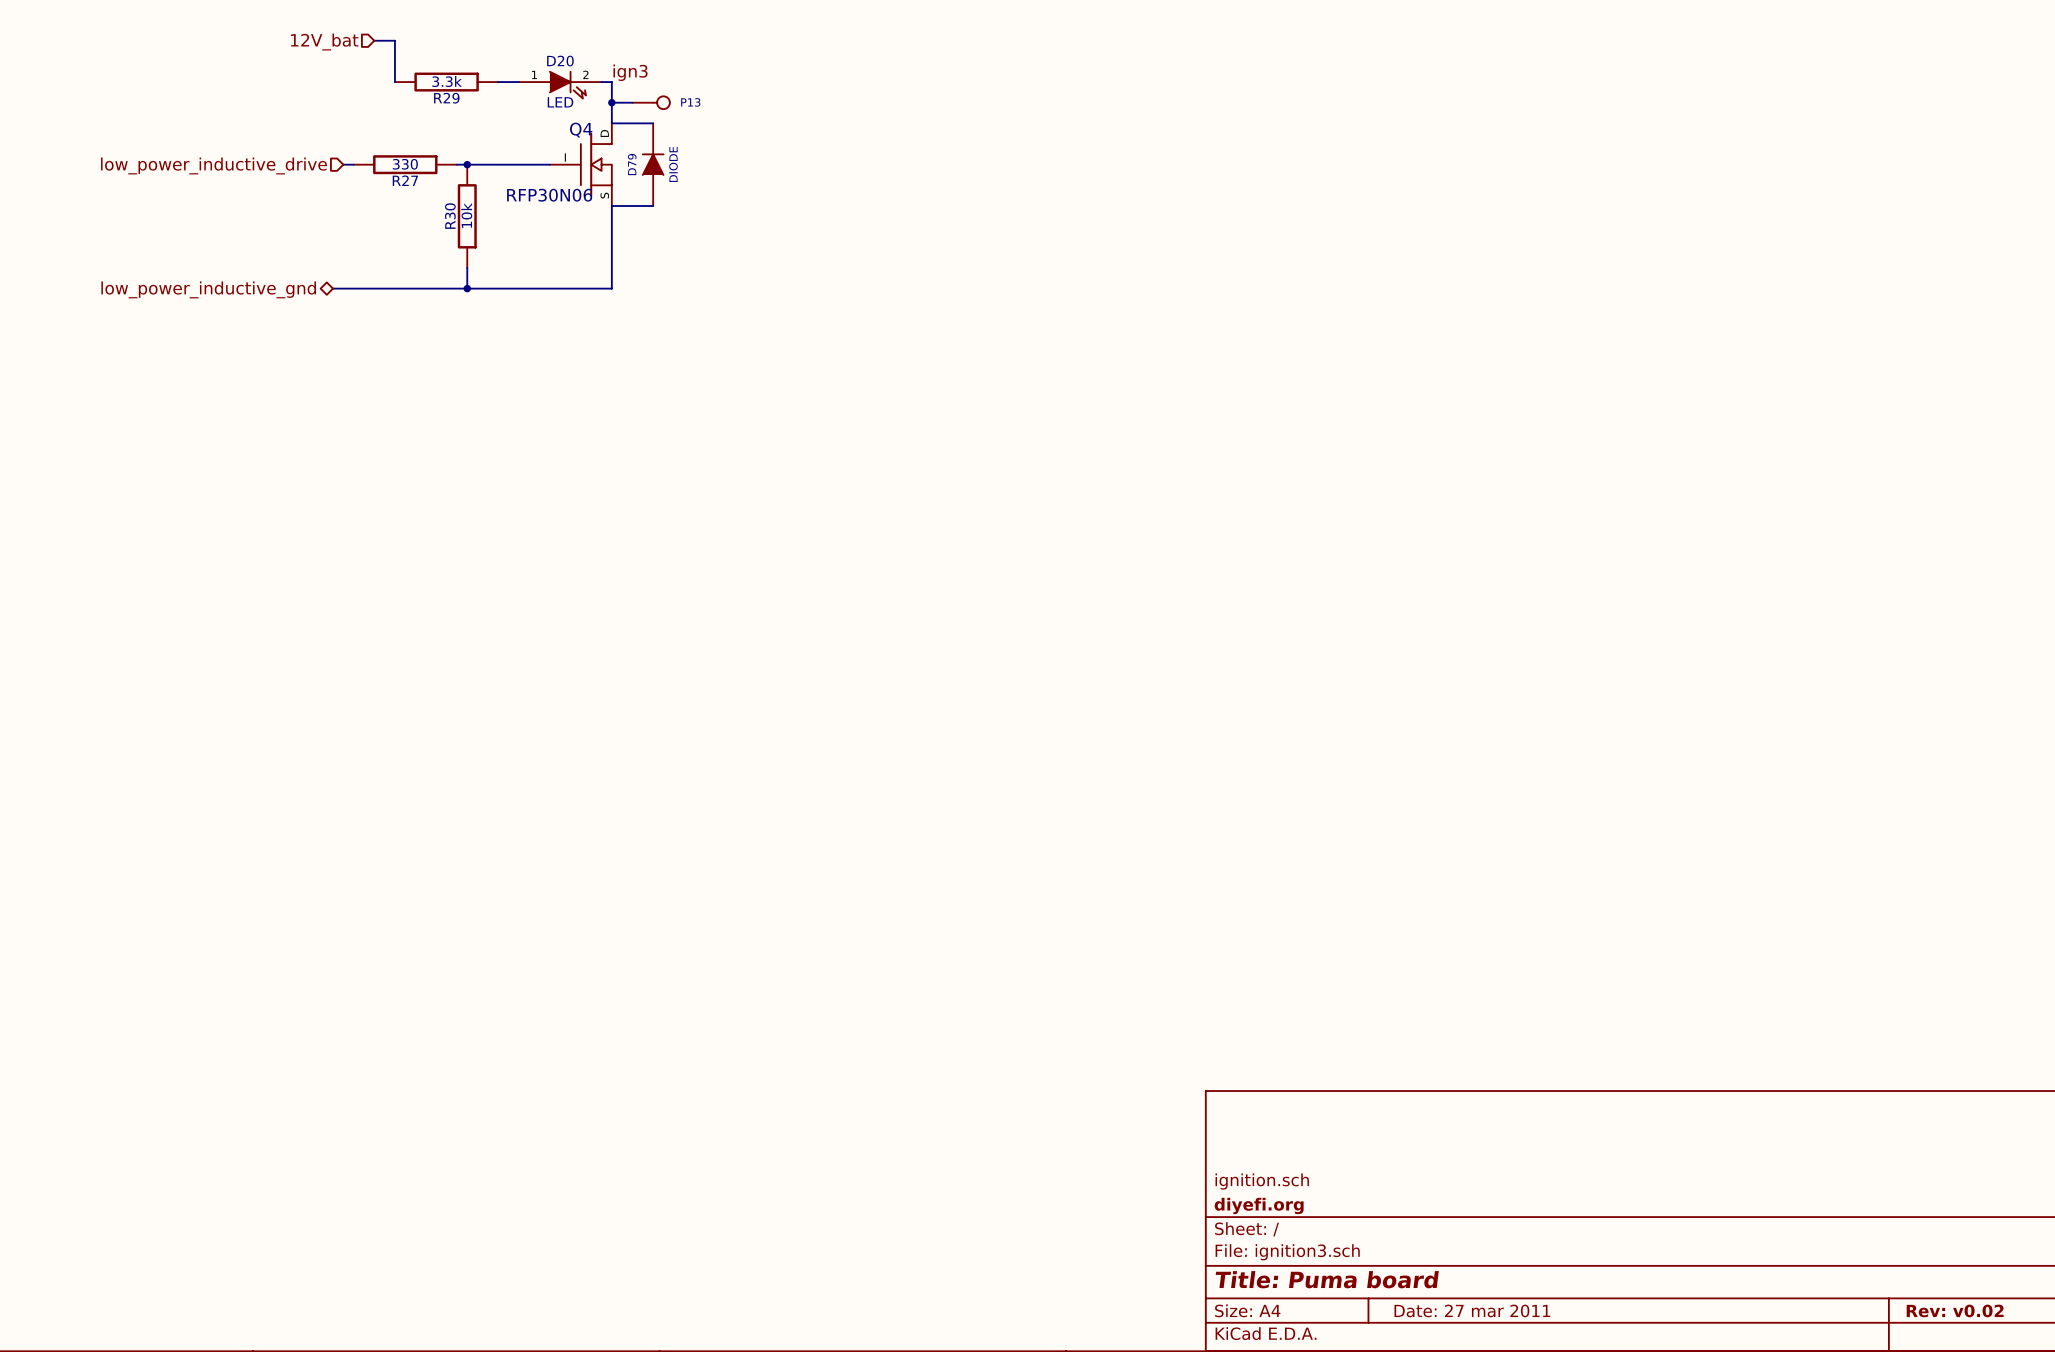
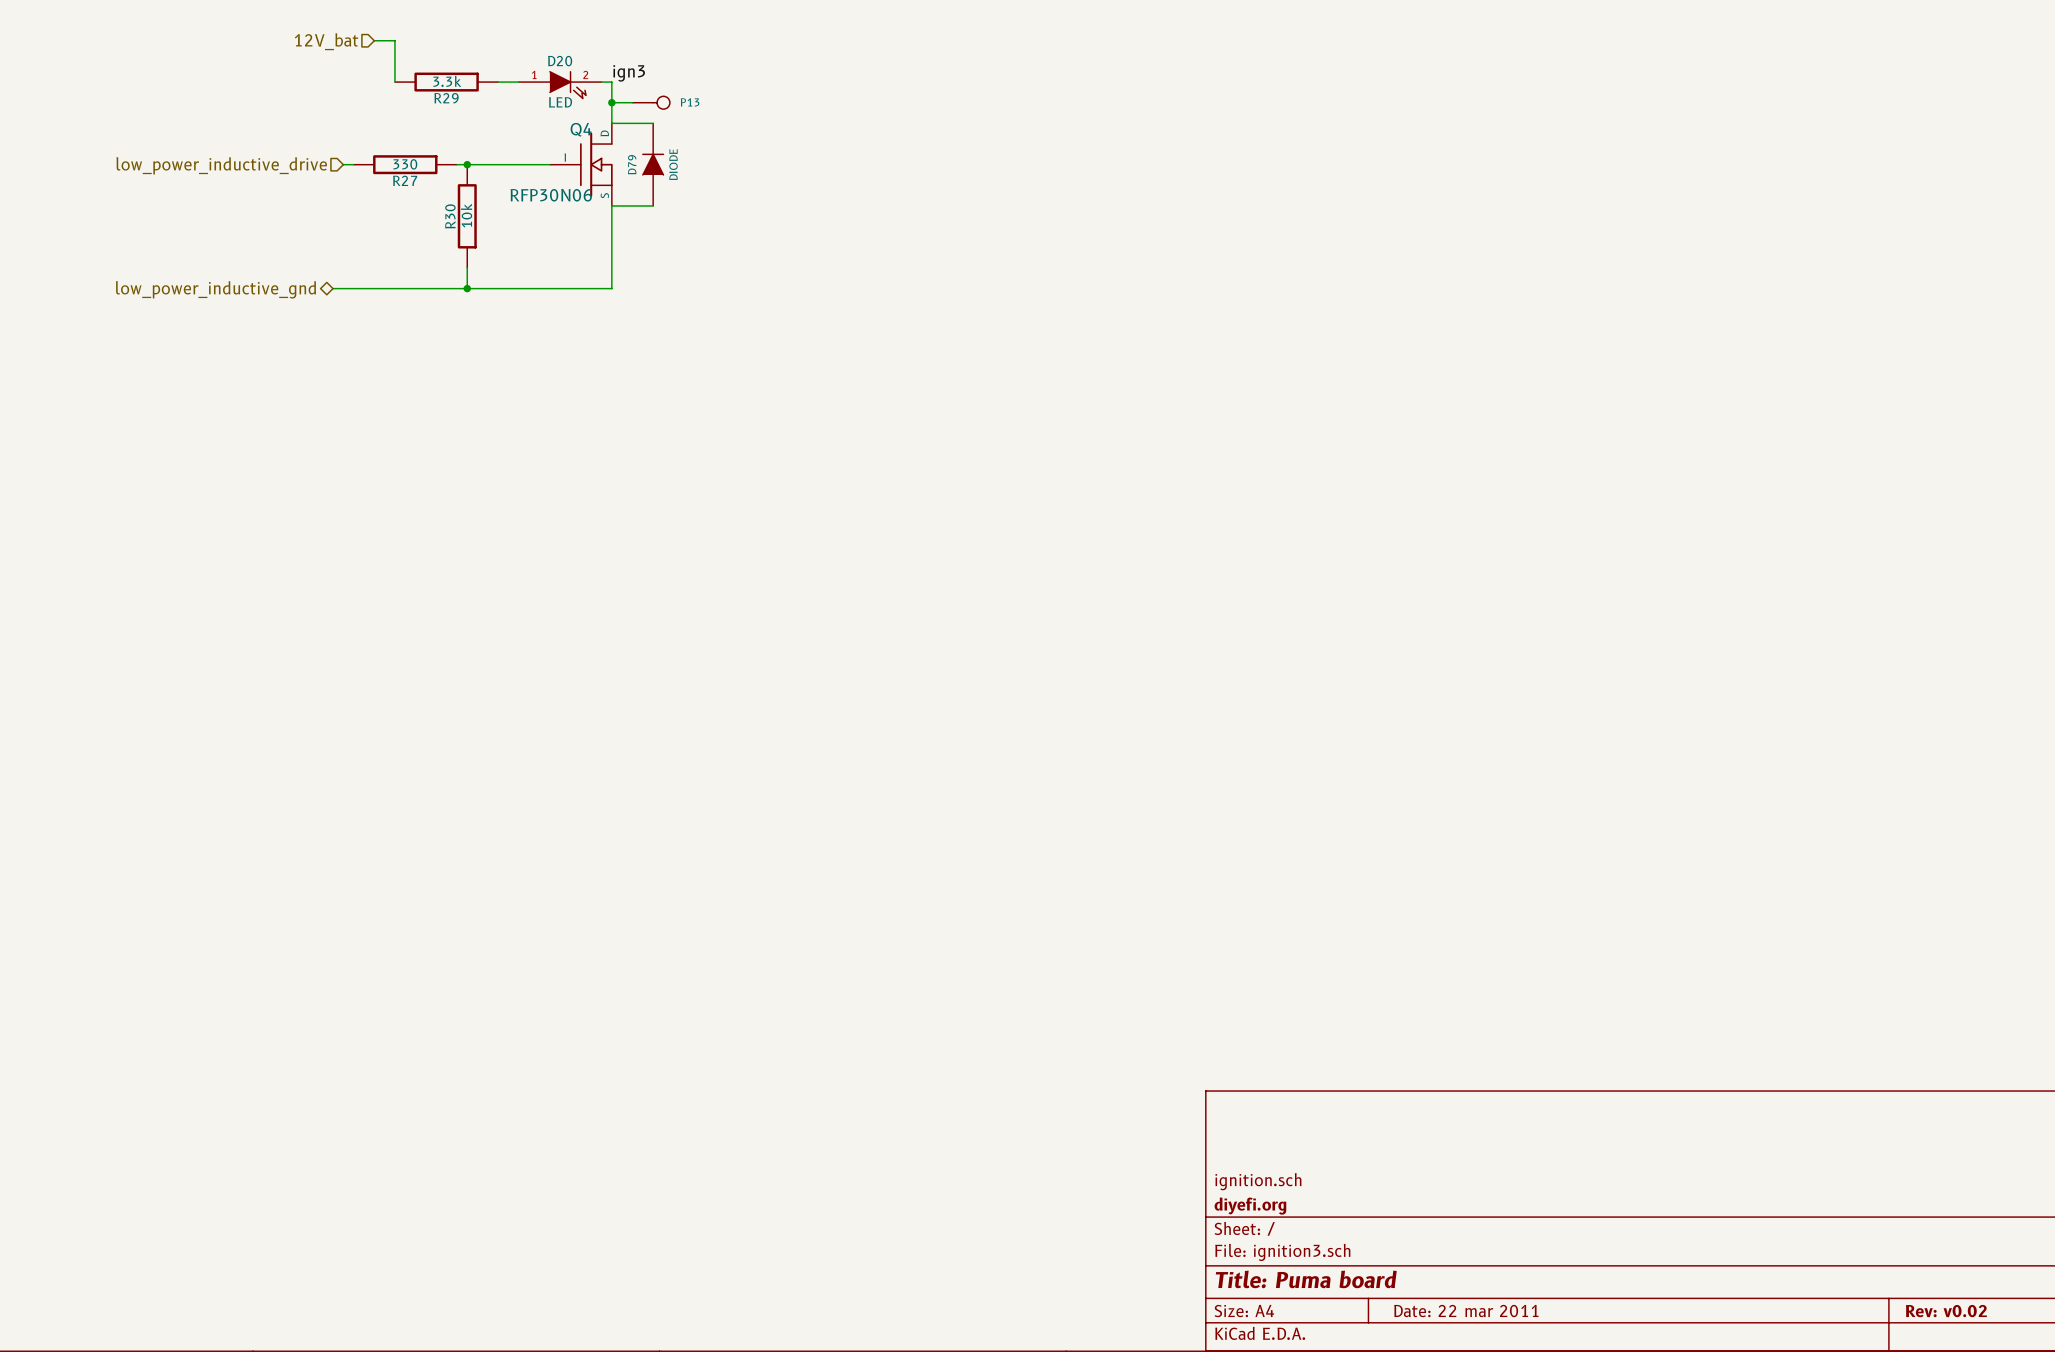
title block: Date: 27 mar 2011 (1472, 1310) -> Date: 22 mar 2011 (1466, 1311)

